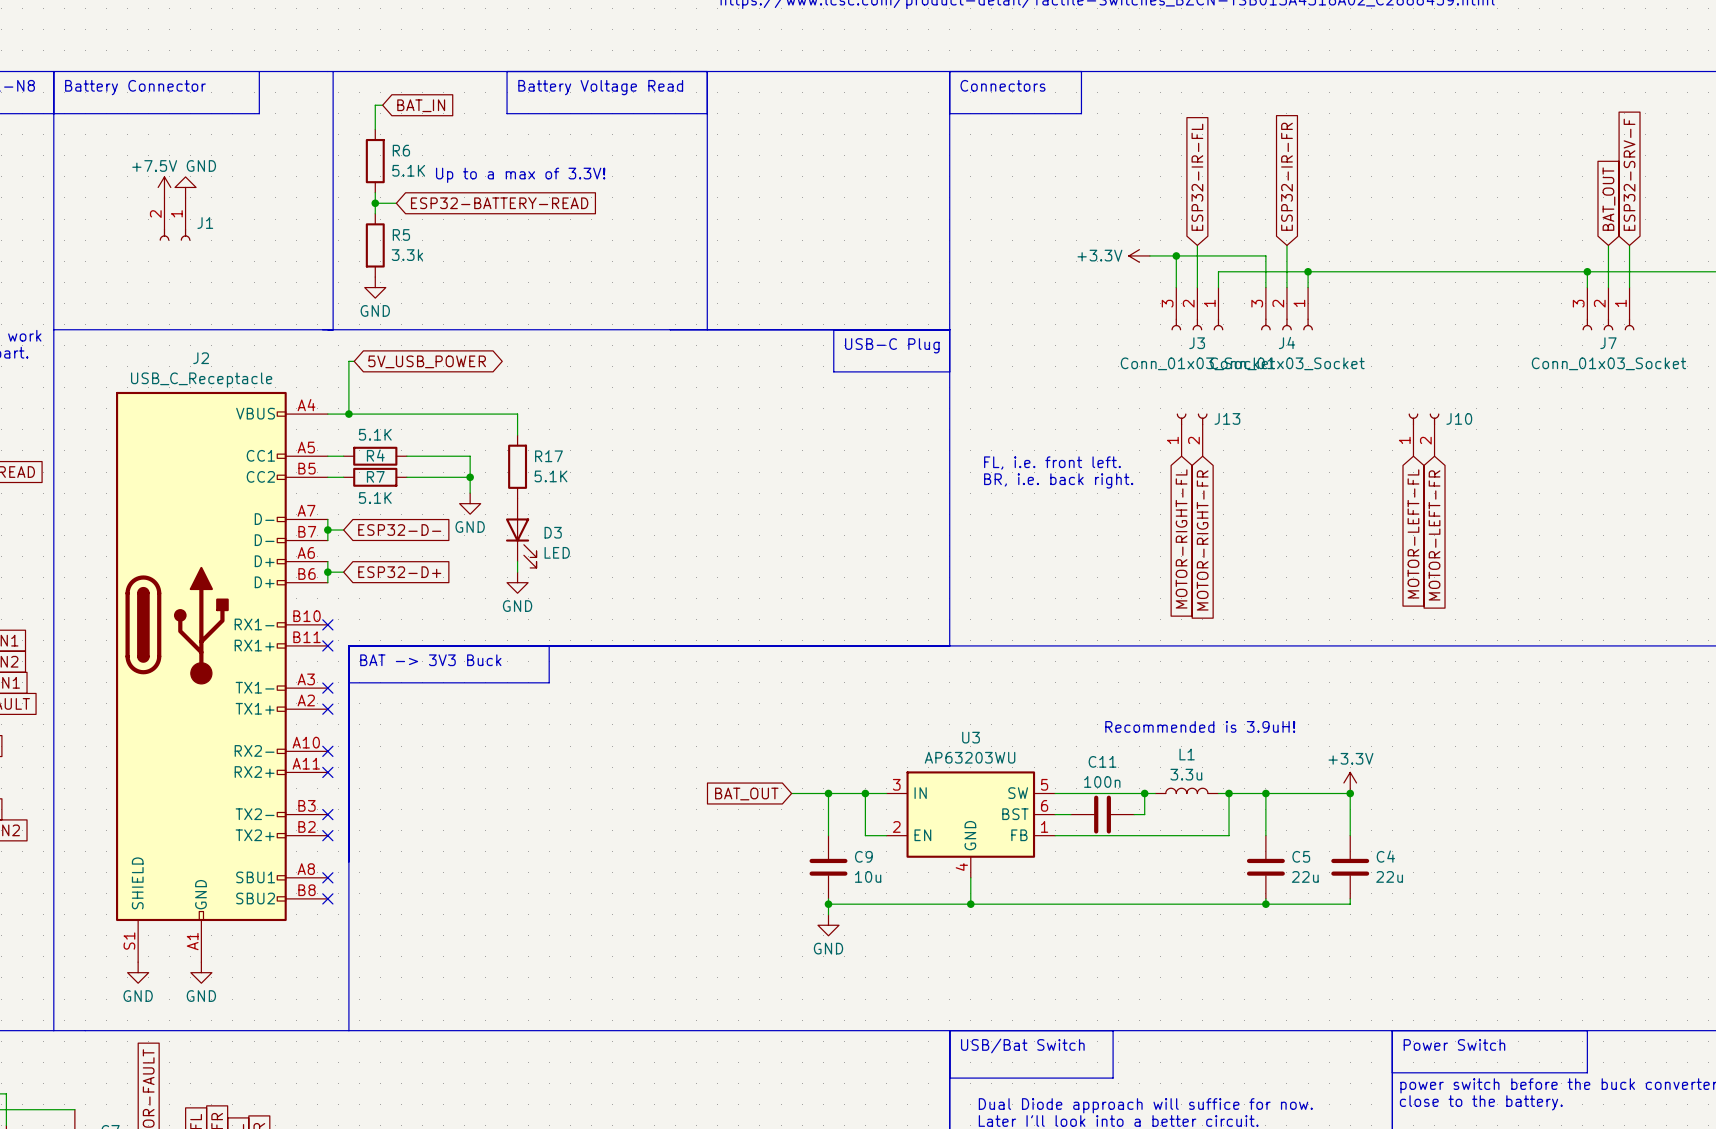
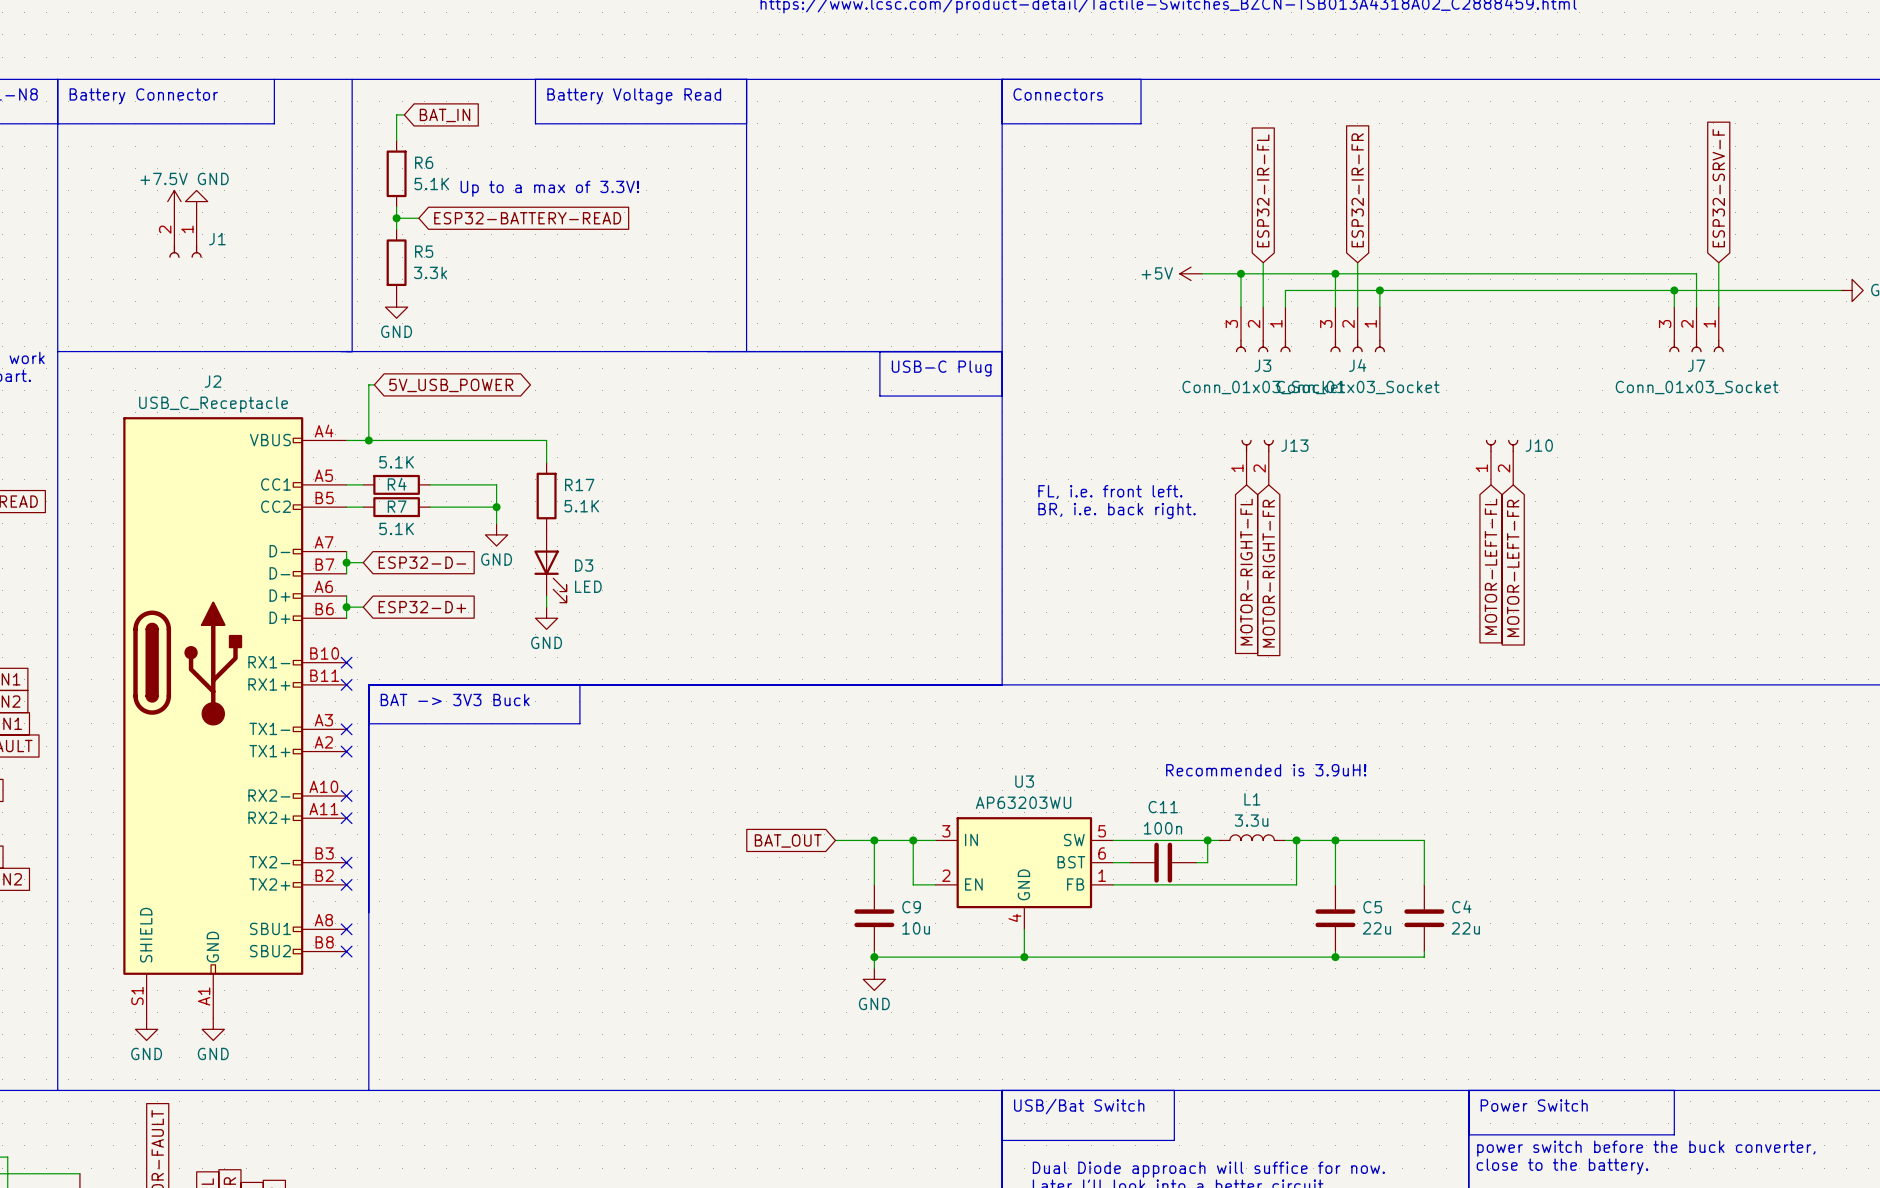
global label: BAT_OUT (1608, 199) -> none
wire: (1608, 245) (1608, 255) -> (1335, 273) (1696, 273)
power symbol: none -> +5V (1191, 273)
power symbol: +3.3V (1139, 255) -> none
junction: none -> (1335, 273)
power symbol: +3.3V (1350, 782) -> none
junction: (1350, 793) -> none

